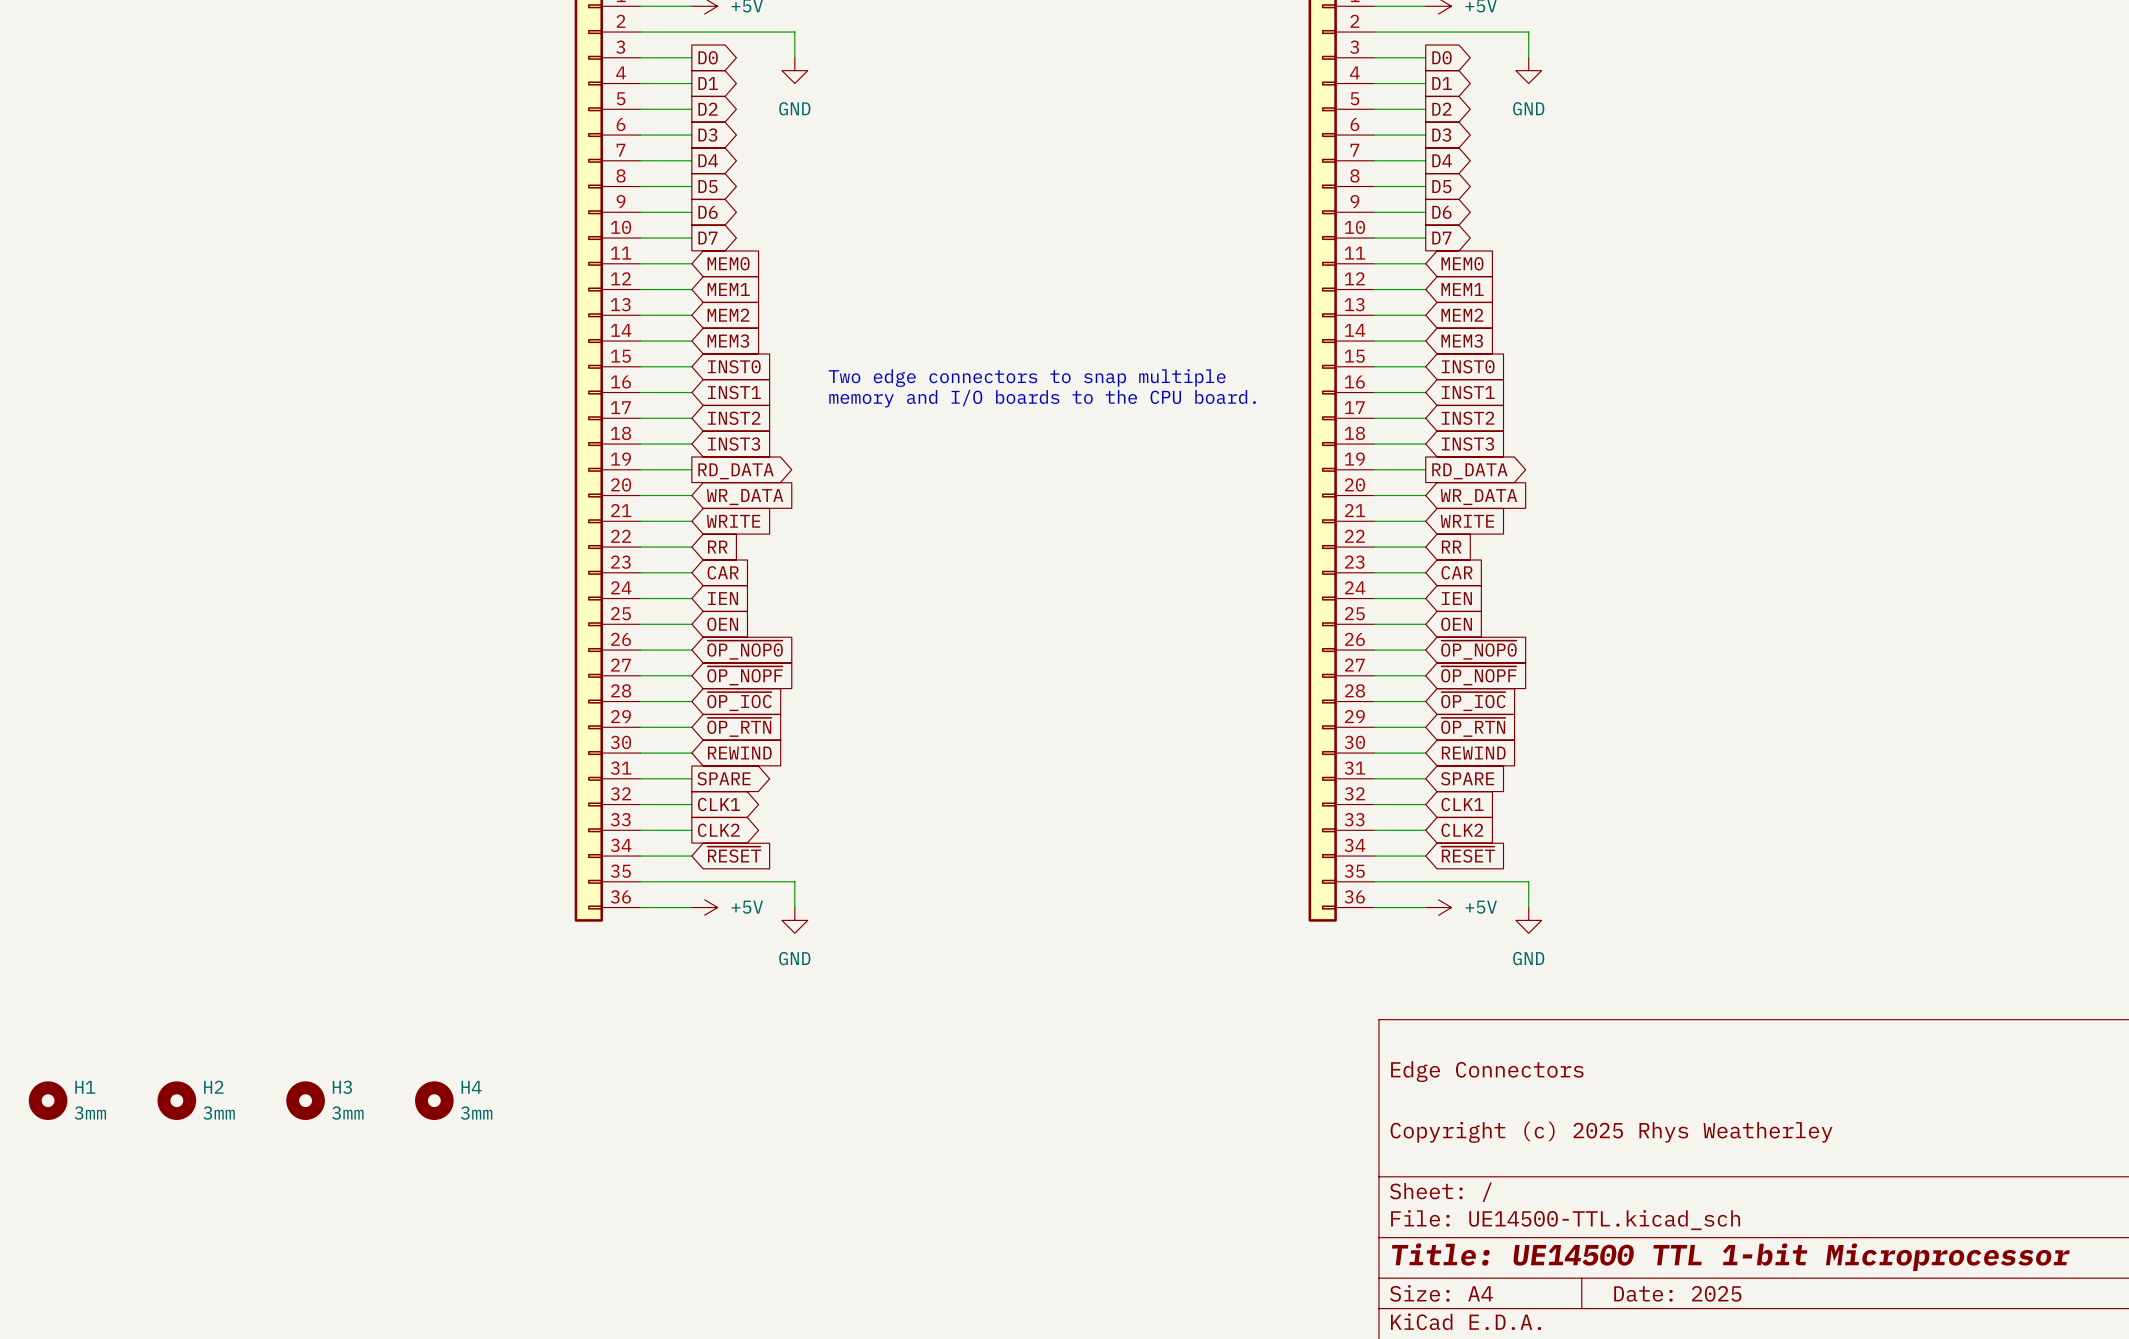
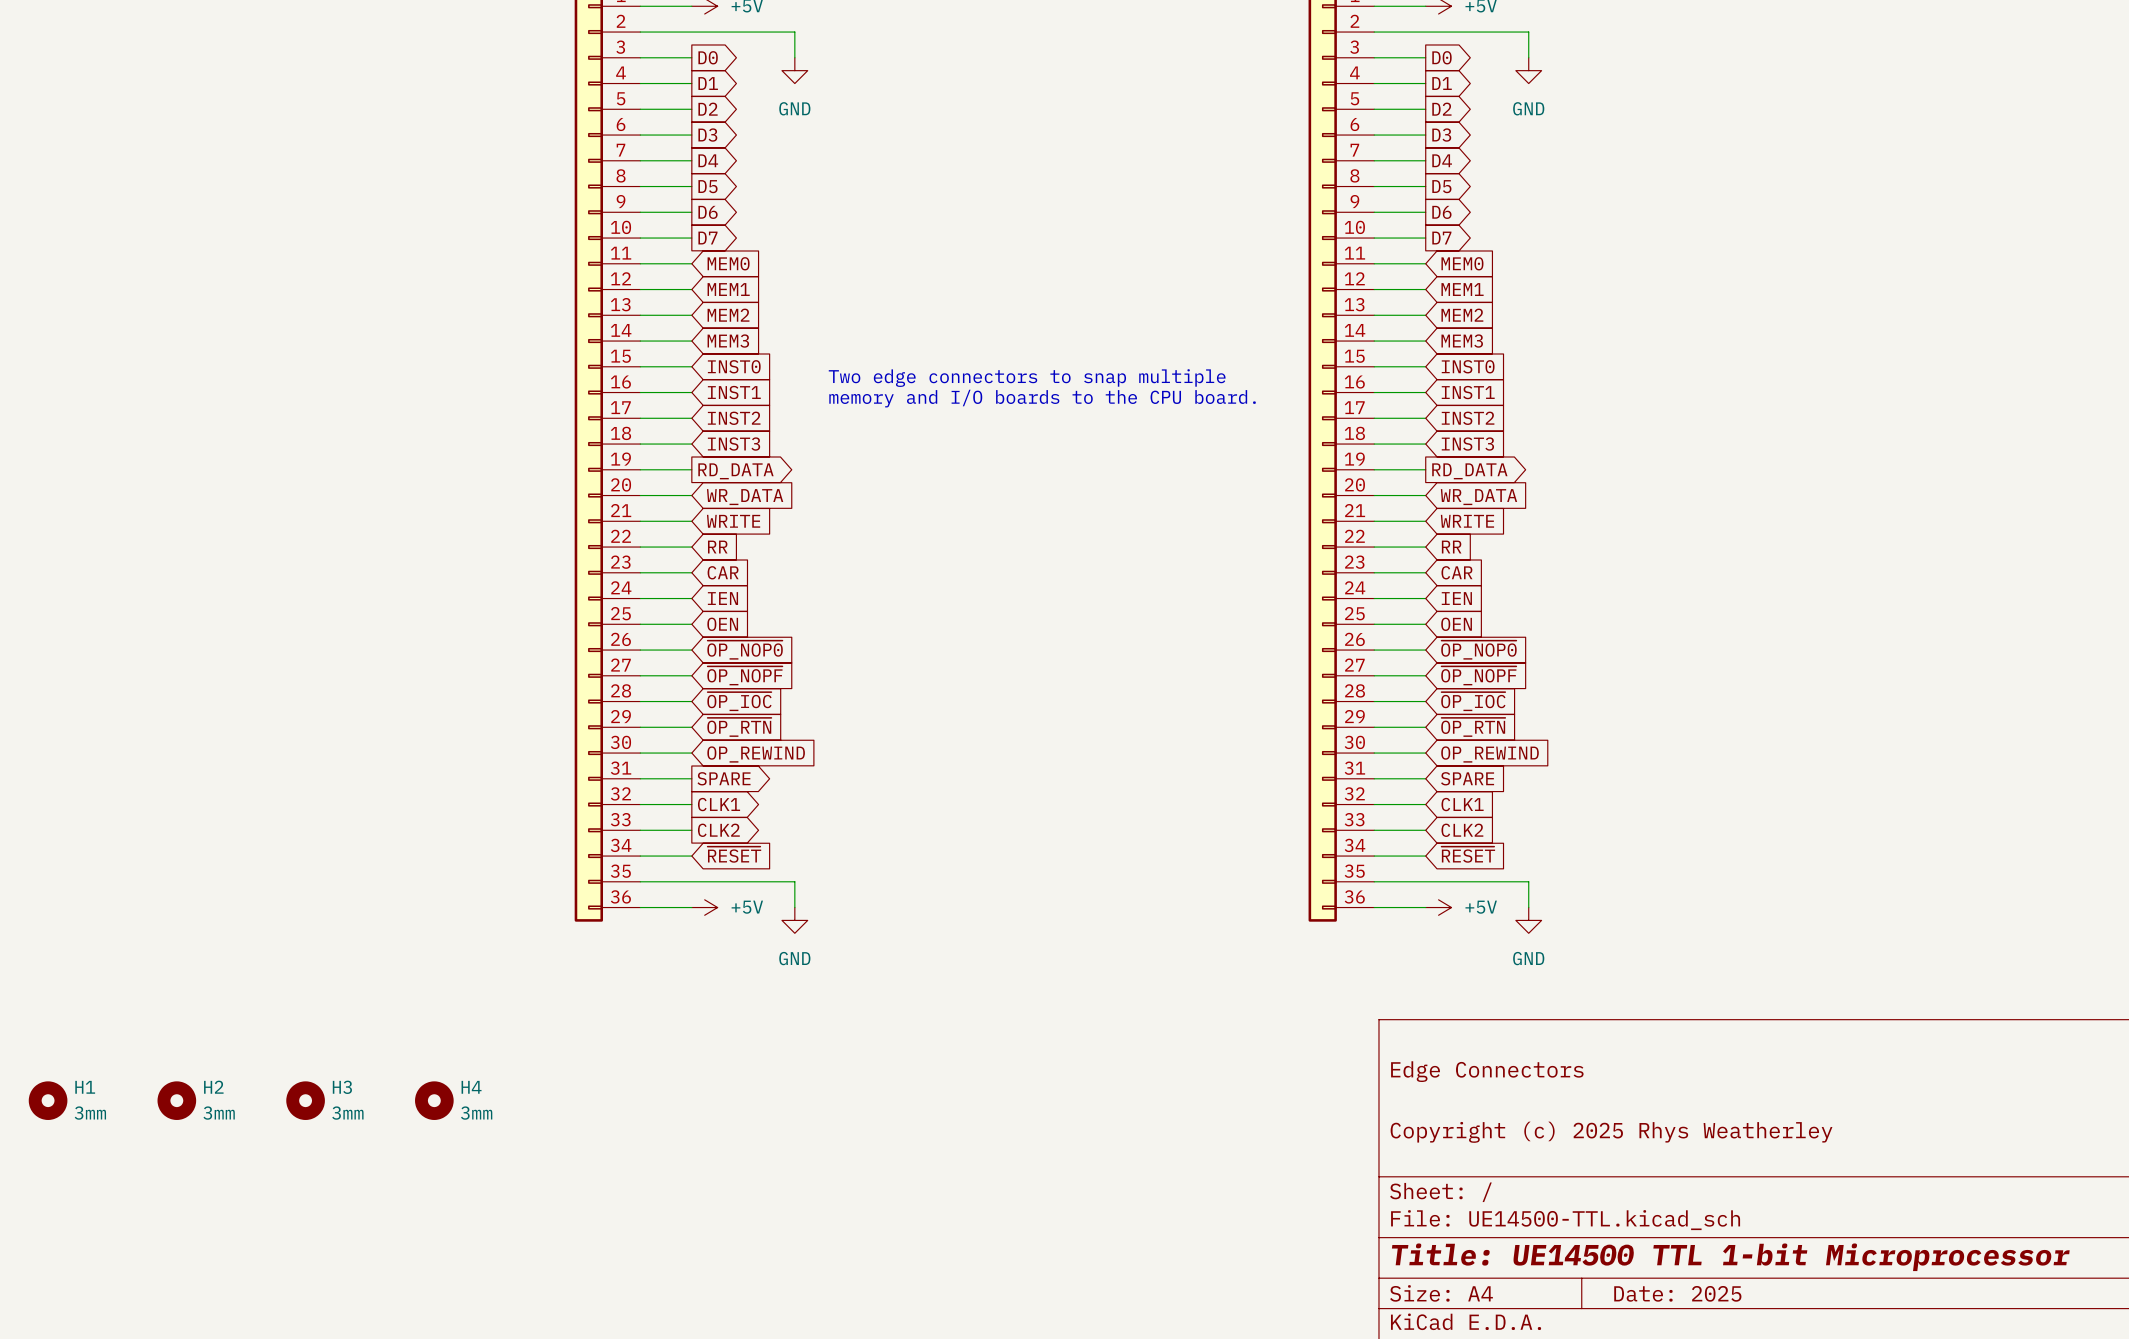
global label: REWIND (739, 753) -> OP_REWIND (756, 754)
global label: REWIND (1473, 753) -> OP_REWIND (1490, 754)

